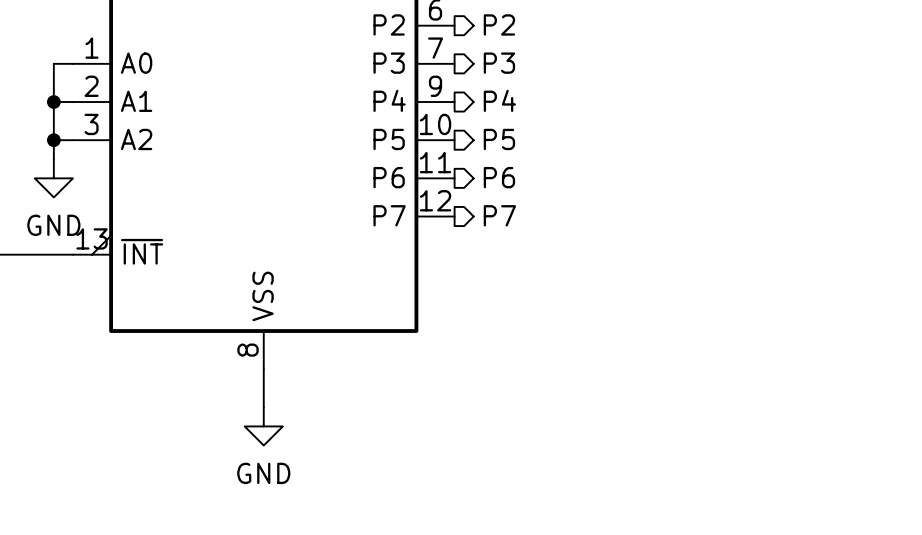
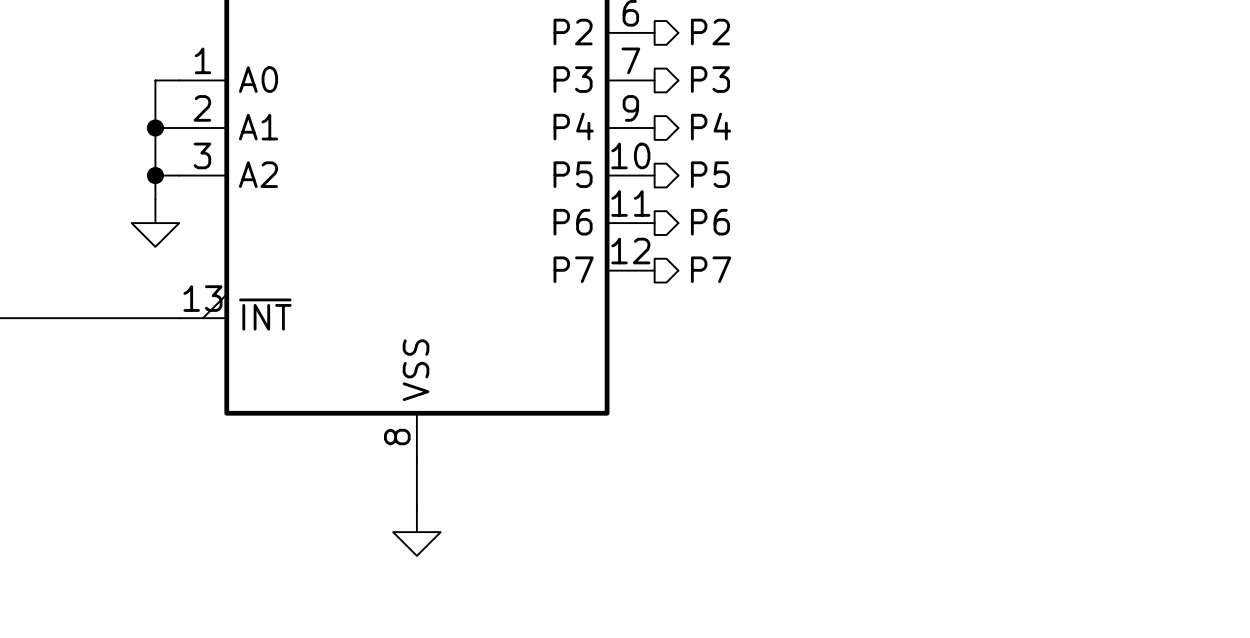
power symbol text: GND (53, 225) -> none
power symbol text: GND (263, 473) -> none

